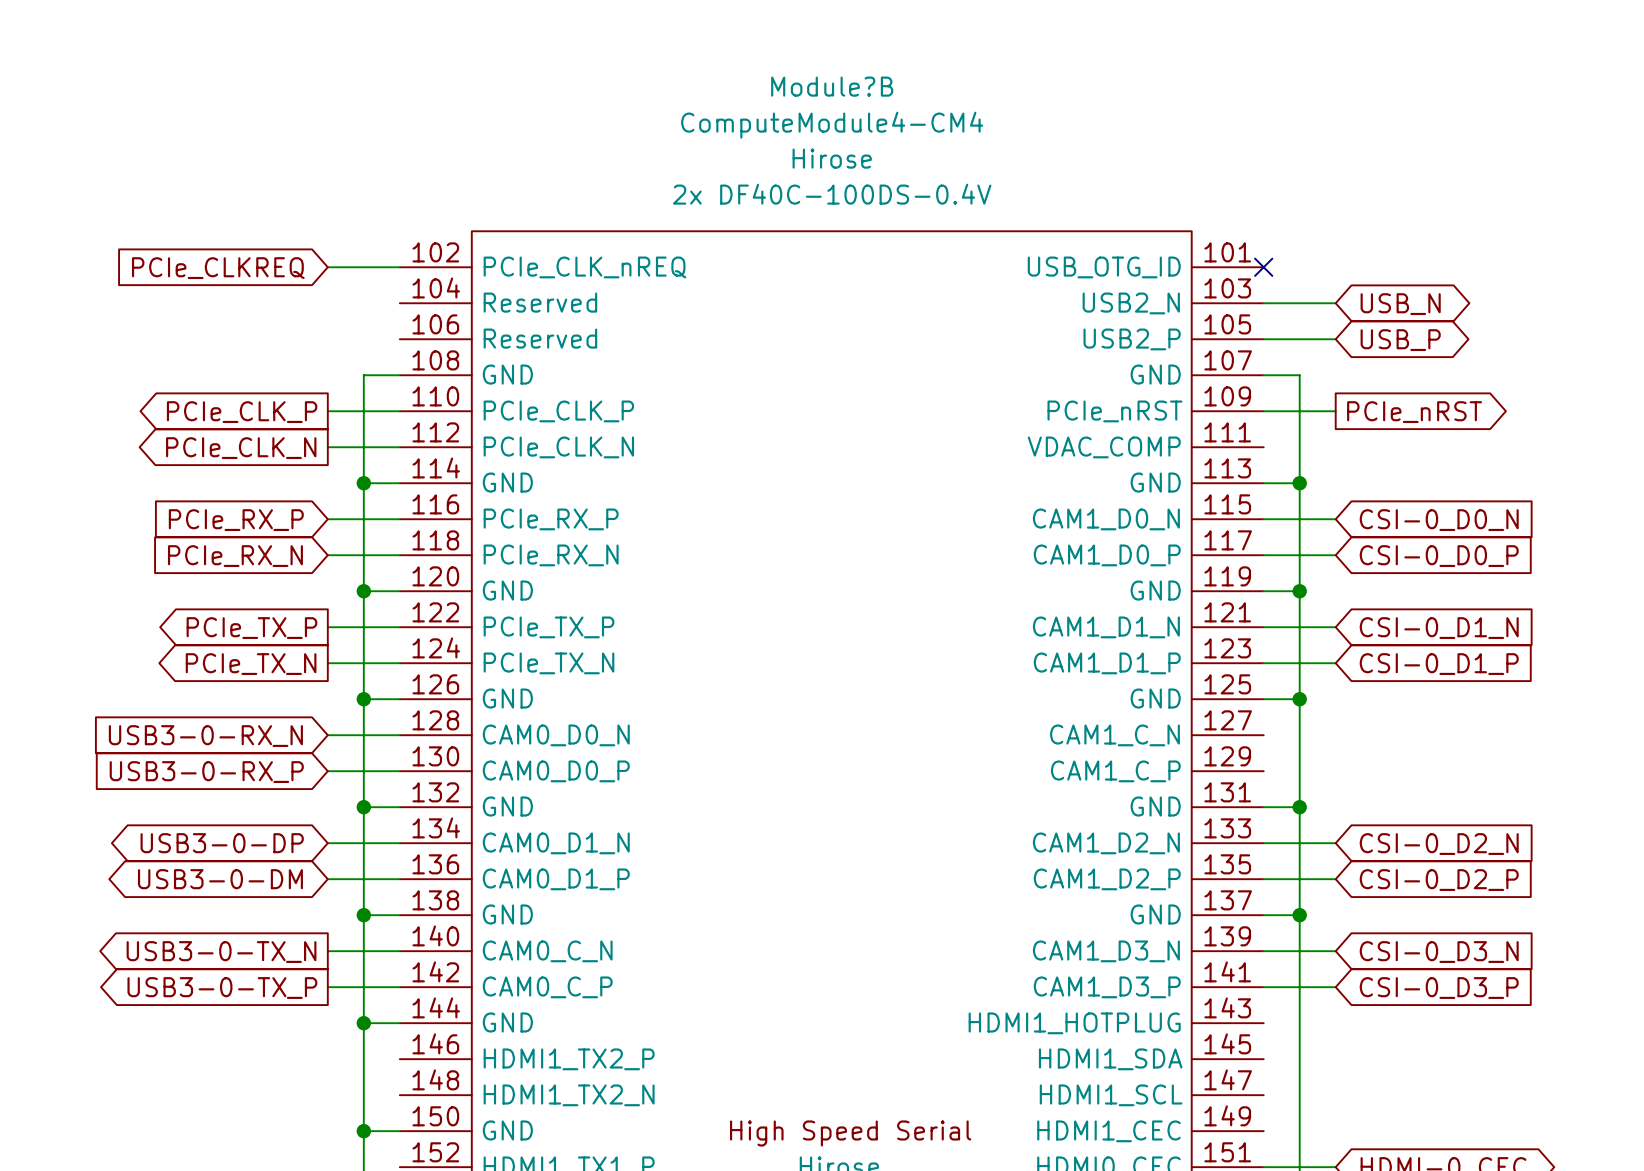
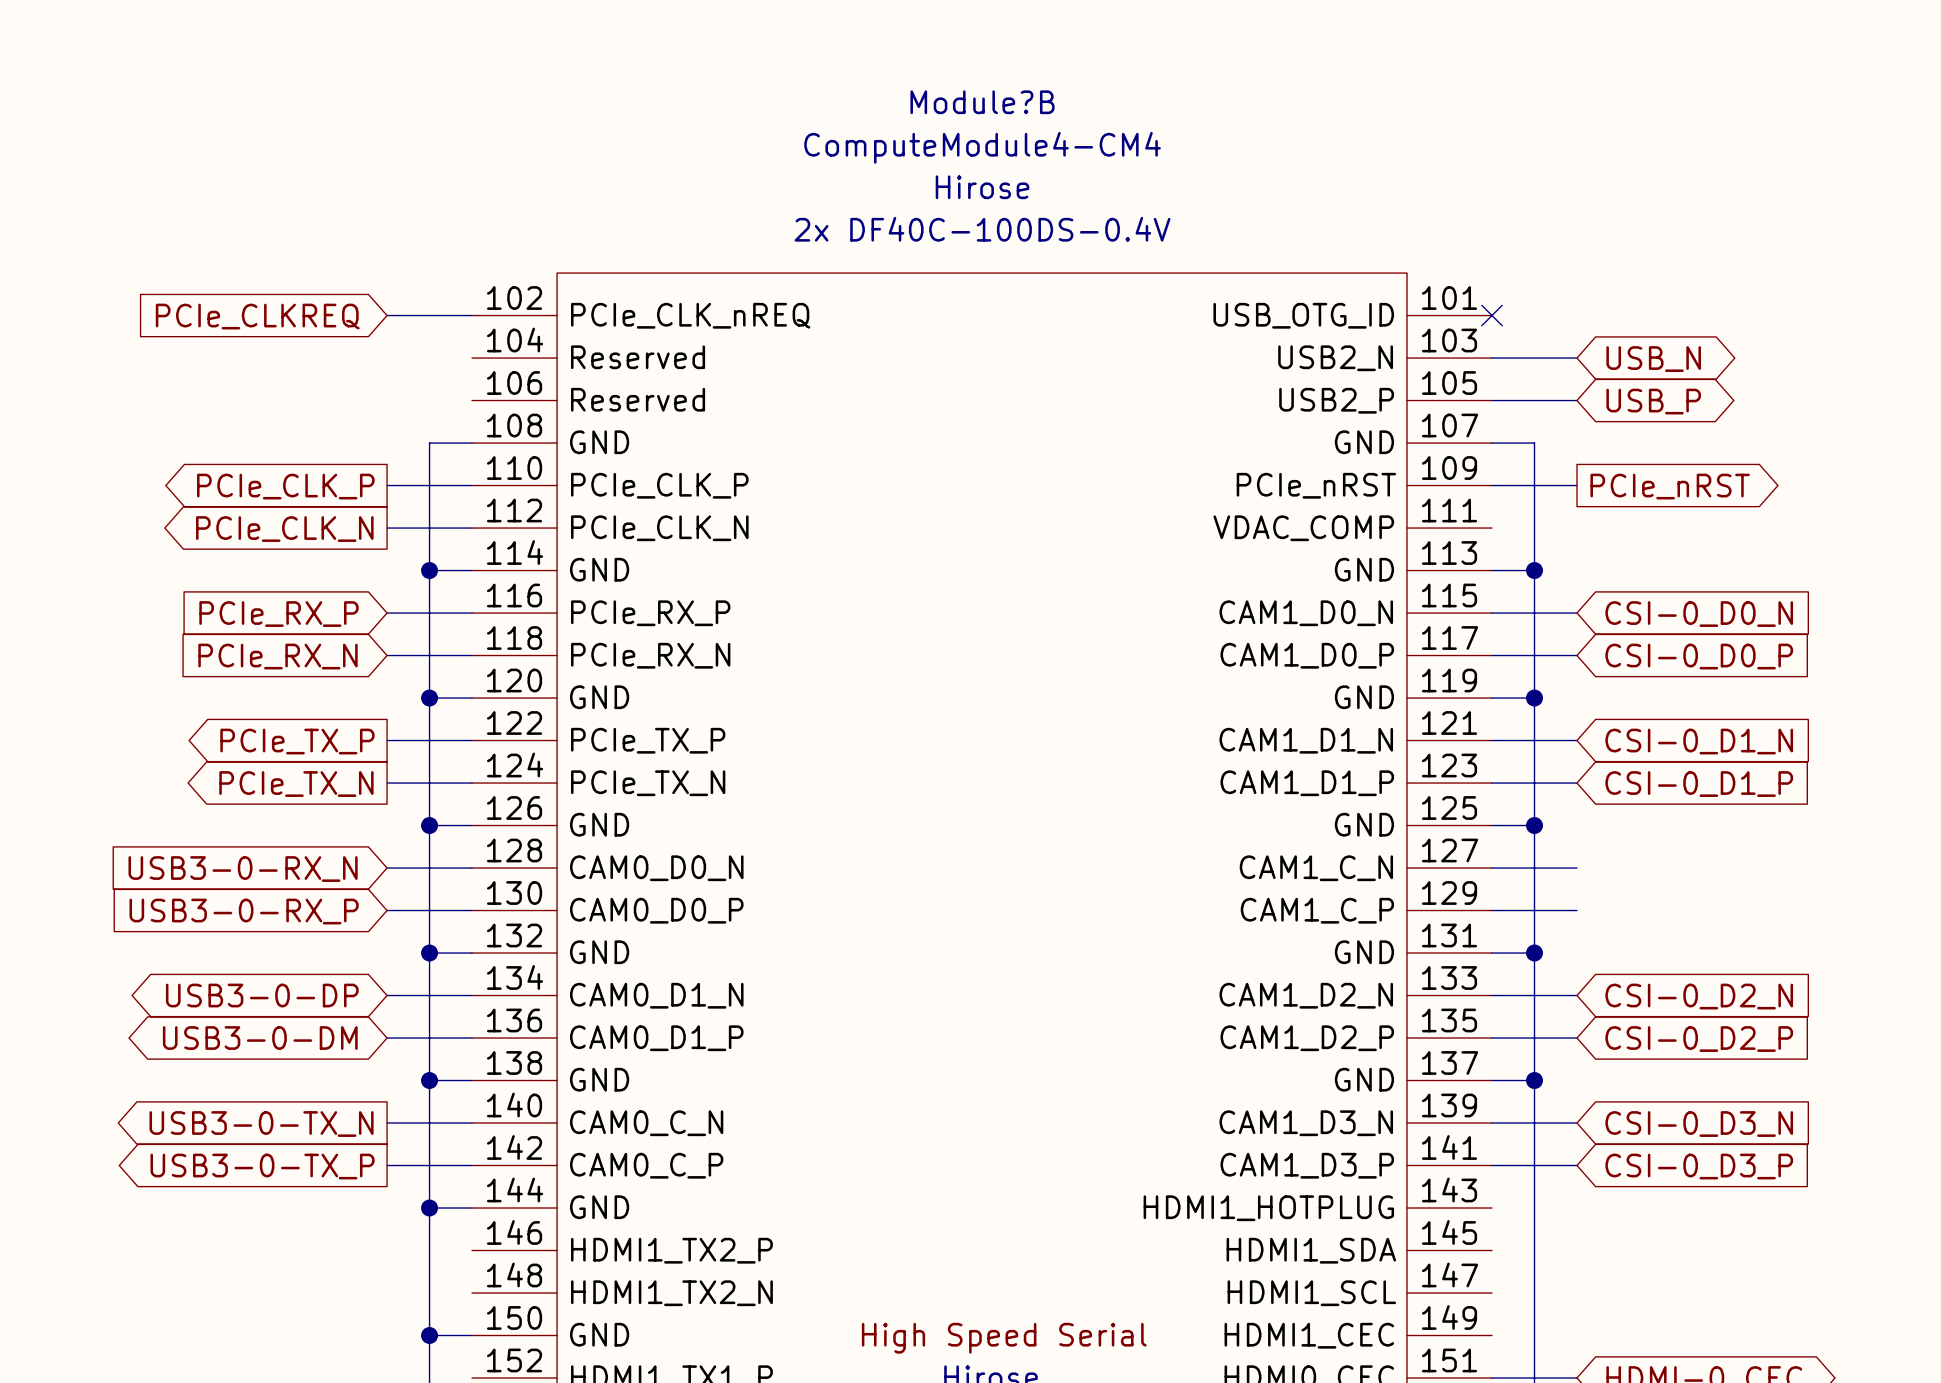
wire: none -> (1492, 868) (1577, 868)
wire: none -> (1492, 910) (1577, 910)

